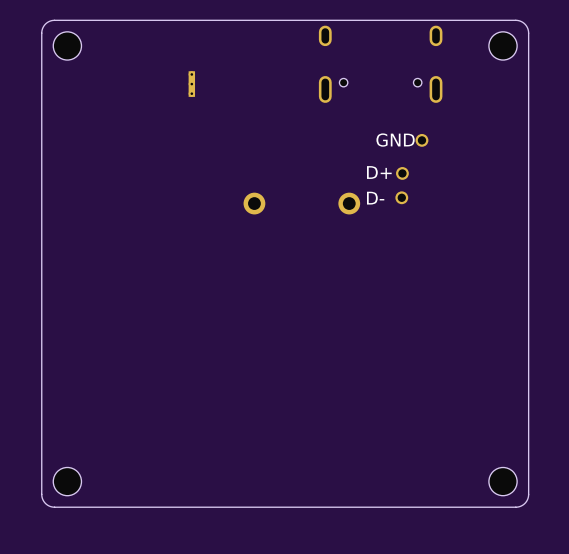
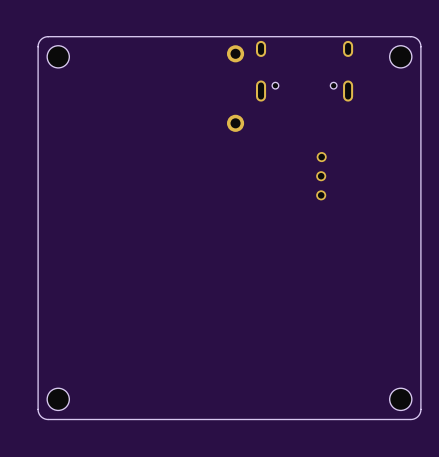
part: none -> (235, 53)
part: (191, 84) -> none
part: none -> (235, 123)
text: GND (395, 140) -> none
part position: (421, 140) -> (321, 195)
text: D+ (379, 172) -> none
text: D- (375, 198) -> none
part: (254, 203) -> none
part: (349, 203) -> none

